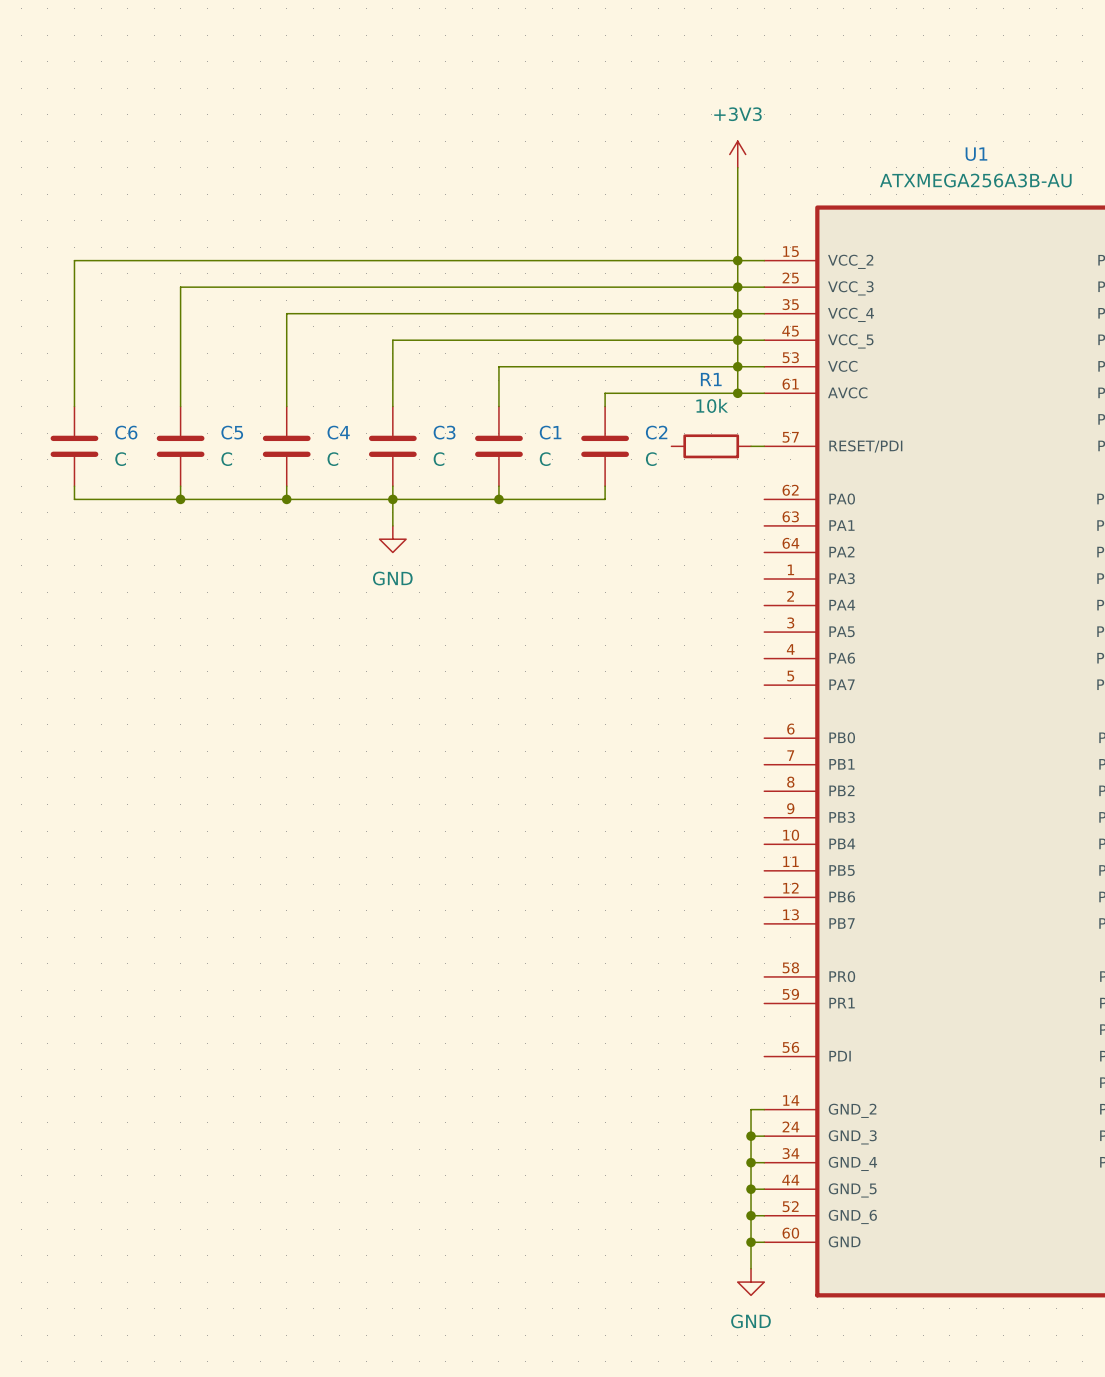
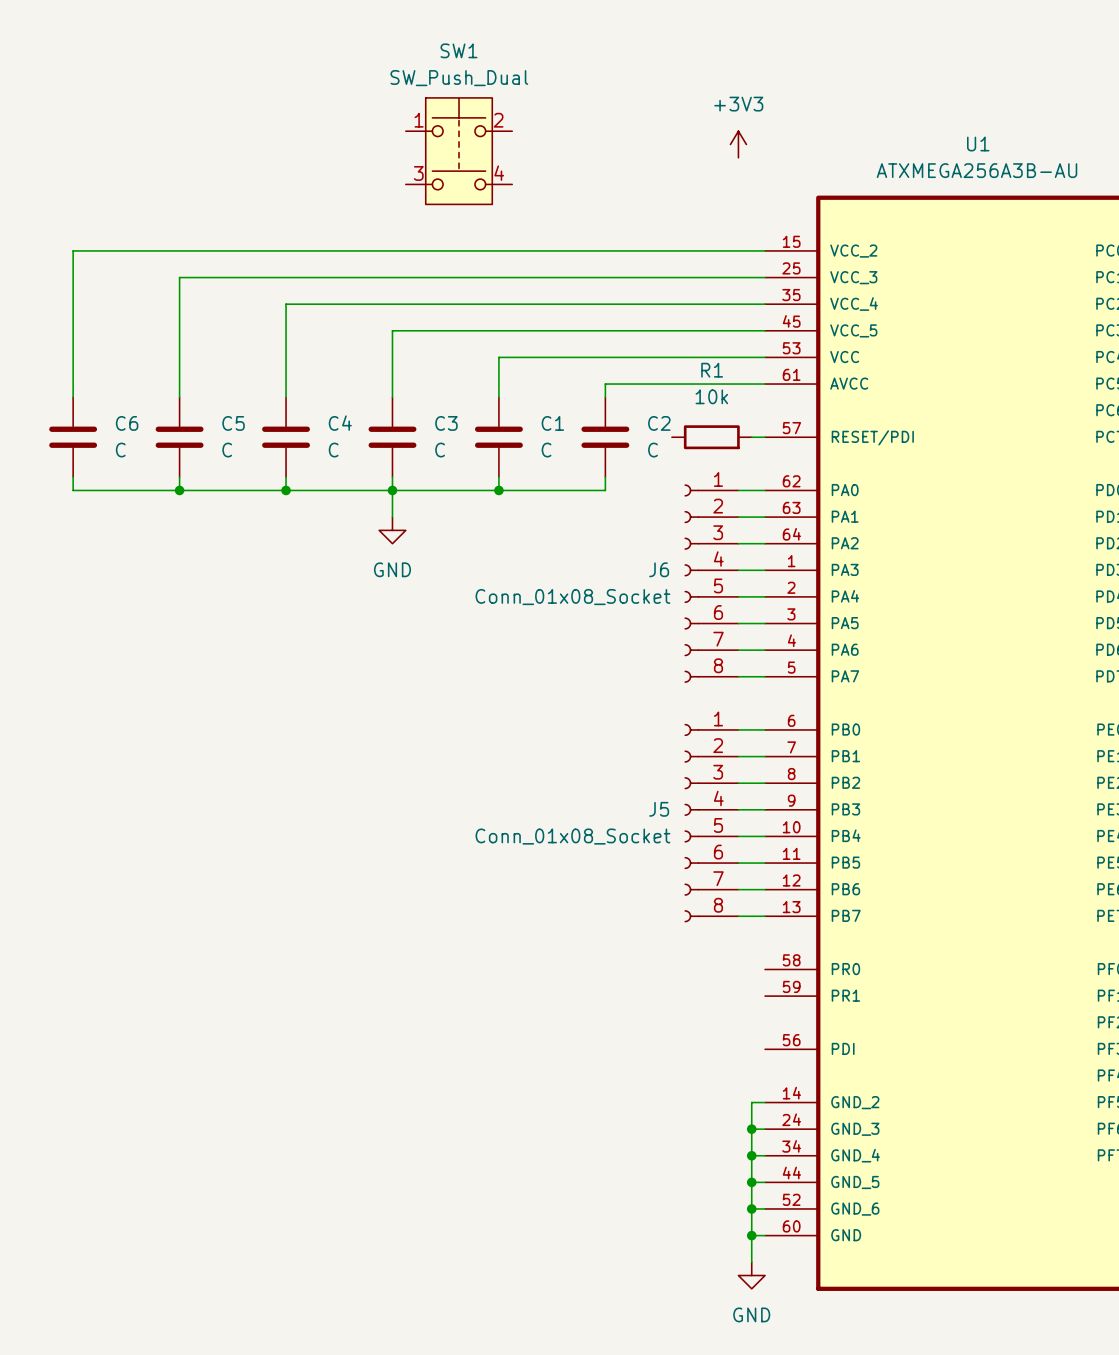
SW1: none -> SW_Push_Dual (459, 151)
wire: (737, 167) (737, 393) -> none
junction: (737, 260) -> none
junction: (737, 287) -> none
junction: (737, 313) -> none
junction: (737, 340) -> none
junction: (737, 366) -> none
junction: (737, 393) -> none
wire: none -> (738, 490) (765, 490)
wire: none -> (738, 517) (765, 517)
wire: none -> (738, 543) (765, 543)
wire: none -> (738, 570) (765, 570)
J6: none -> Conn_01x08_Socket (711, 583)
wire: none -> (738, 596) (765, 596)
wire: none -> (738, 623) (765, 623)
wire: none -> (738, 650) (765, 650)
wire: none -> (738, 676) (765, 676)
wire: none -> (738, 729) (765, 729)
wire: none -> (738, 756) (765, 756)
wire: none -> (738, 783) (765, 783)
wire: none -> (738, 809) (765, 809)
J5: none -> Conn_01x08_Socket (711, 823)
wire: none -> (738, 836) (765, 836)
wire: none -> (738, 863) (765, 863)
wire: none -> (738, 889) (765, 889)
wire: none -> (738, 916) (765, 916)

